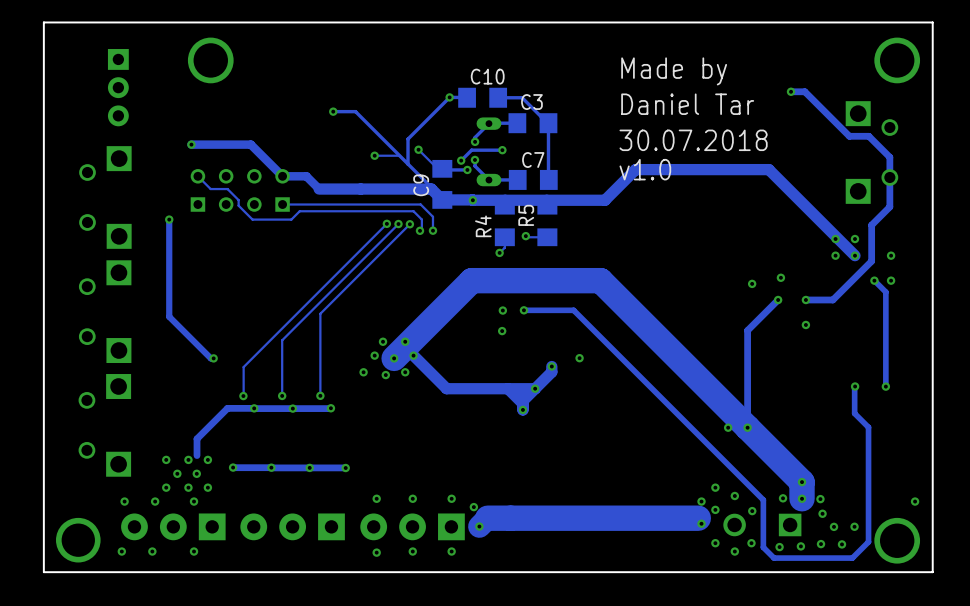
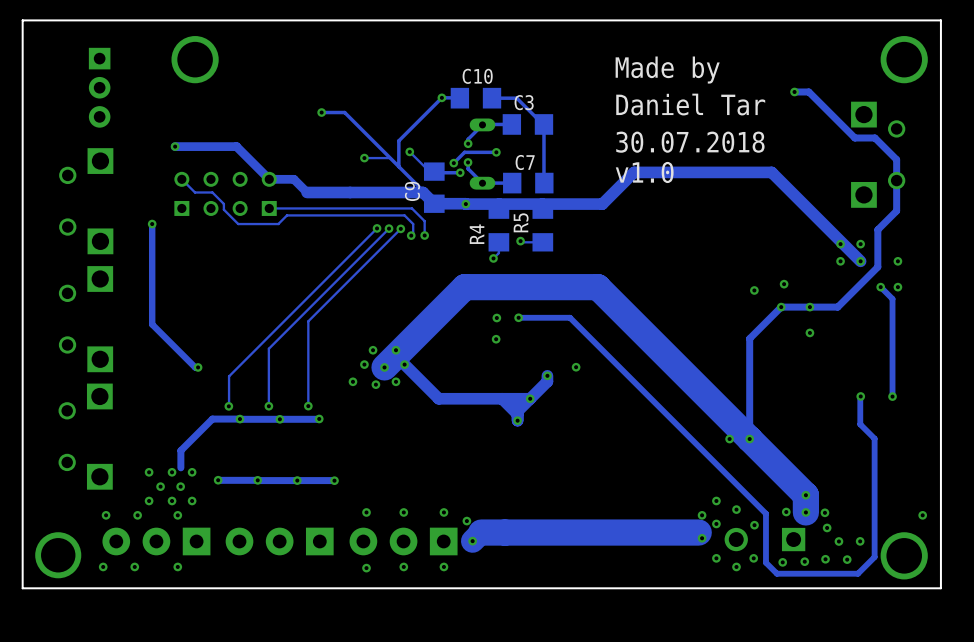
track: none -> (809, 307) (781, 307)

